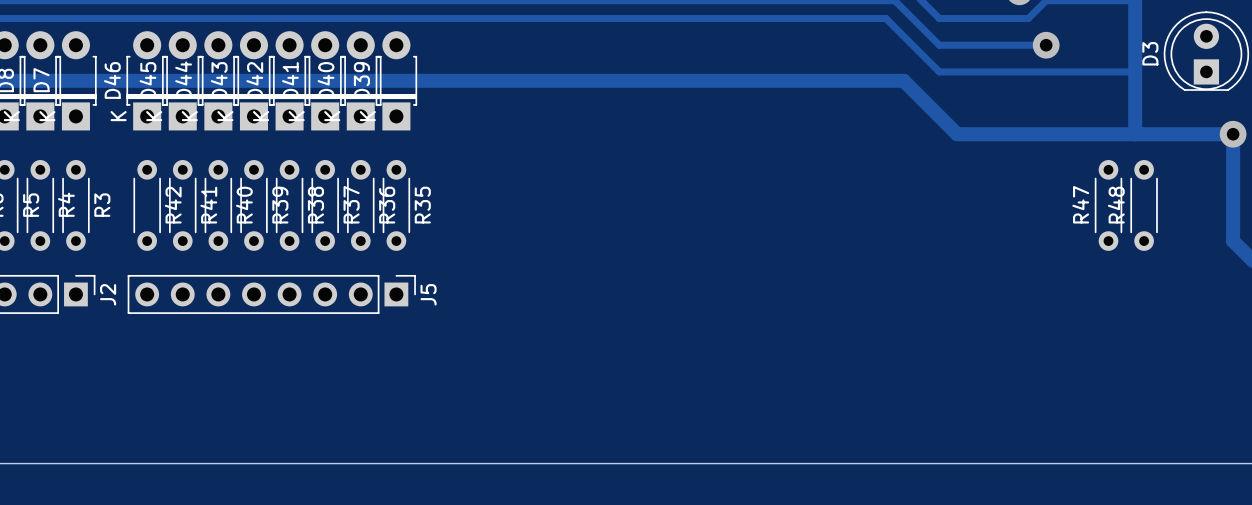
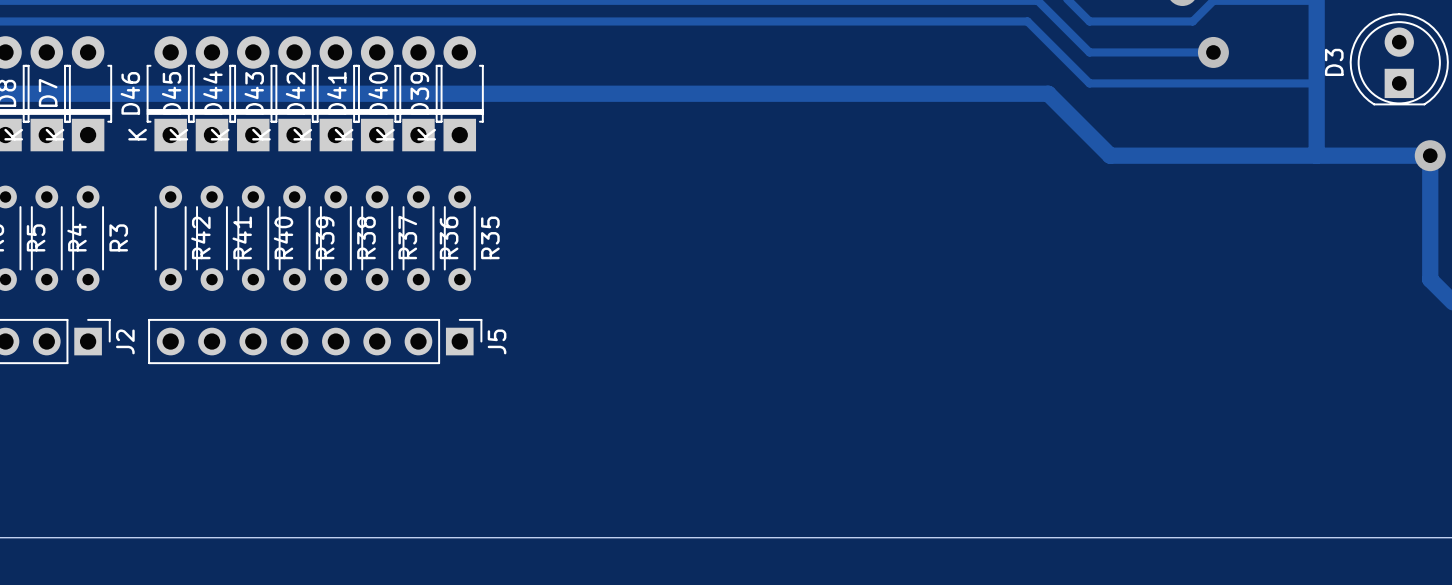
R47: (1108, 205) -> none
R48: (1144, 205) -> none

